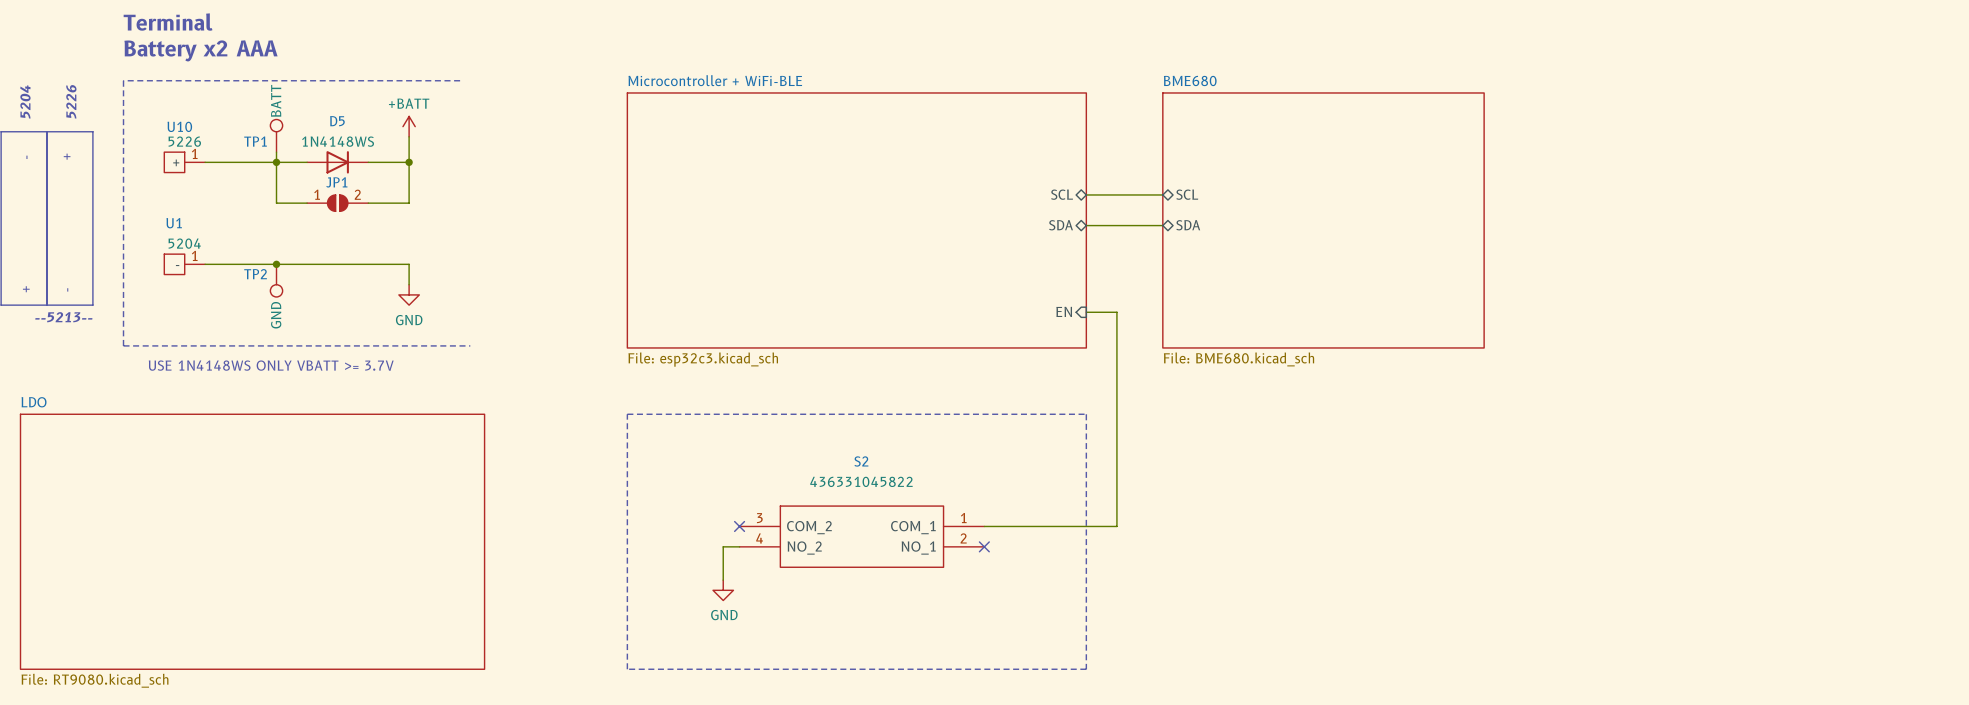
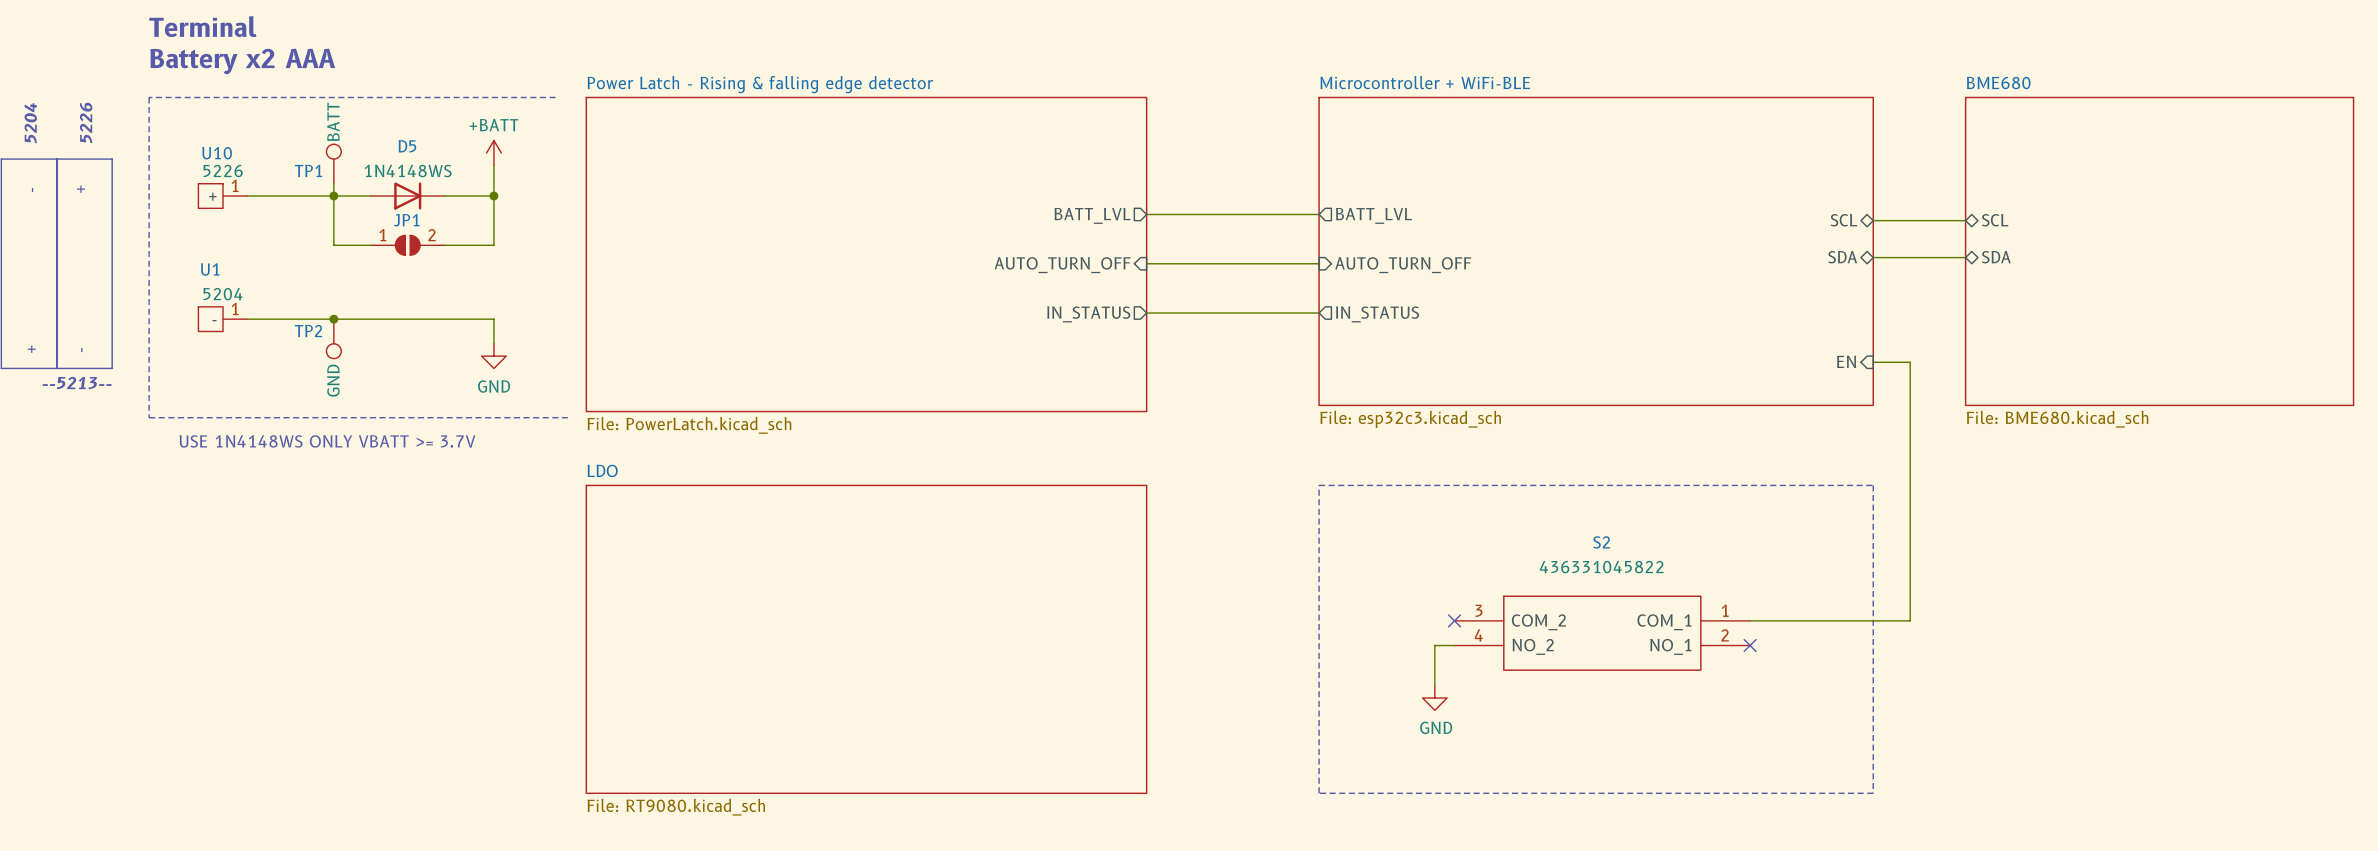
wire: none -> (1146, 214) (1319, 214)
sheet pin: none -> BATT_LVL (1092, 215)
sheet pin: none -> BATT_LVL (1374, 215)
sheet pin: none -> SCL (1843, 220)
wire: none -> (1873, 220) (1965, 220)
sheet pin: none -> SCL (1995, 220)
sheet pin: SCL (1062, 194) -> none
wire: (1086, 194) (1162, 194) -> none
sheet pin: SCL (1187, 194) -> none
sheet Microcontroller + WiFi-BLE: none -> File: esp32c3.kicad_sch (1596, 251)
sheet Power Latch - Rising & falling edge detector: none -> File: PowerLatch.kicad_sch (866, 254)
sheet pin: none -> SDA (1842, 257)
wire: none -> (1873, 257) (1965, 257)
sheet pin: none -> SDA (1996, 257)
wire: none -> (1146, 263) (1319, 263)
sheet pin: none -> AUTO_TURN_OFF (1062, 265)
sheet pin: none -> AUTO_TURN_OFF (1403, 265)
sheet Microcontroller + WiFi-BLE: File: esp32c3.kicad_sch (856, 220) -> none
sheet BME680 position: (1323, 220) -> (2159, 251)
sheet pin: SDA (1061, 225) -> none
wire: (1086, 225) (1162, 225) -> none
sheet pin: SDA (1188, 225) -> none
wire: none -> (1146, 313) (1319, 313)
sheet pin: none -> IN_STATUS (1088, 314)
sheet pin: none -> IN_STATUS (1377, 314)
sheet pin: none -> EN (1846, 361)
wire: none -> (1873, 362) (1910, 362) (1910, 620) (1750, 620)
sheet pin: EN (1064, 311) -> none
wire: (1086, 312) (1116, 312) (1116, 526) (984, 526) -> none
line: none -> (1319, 485) (1873, 485) (1873, 793) (1319, 793) (1319, 485)
line: (627, 414) (1086, 414) (1086, 669) (627, 669) (627, 414) -> none
no-connect mark: none -> (1454, 620)
no-connect mark: (739, 526) -> none
sheet LDO: none -> File: RT9080.kicad_sch (866, 639)
wire: none -> (1454, 645) (1434, 645) (1434, 685)
no-connect mark: none -> (1750, 645)
S2 position: (861, 536) -> (1602, 633)
sheet LDO: File: RT9080.kicad_sch (252, 541) -> none
wire: (739, 546) (723, 546) (723, 580) -> none
no-connect mark: (984, 546) -> none
power symbol: none -> GND (1434, 697)
power symbol: GND (723, 590) -> none

